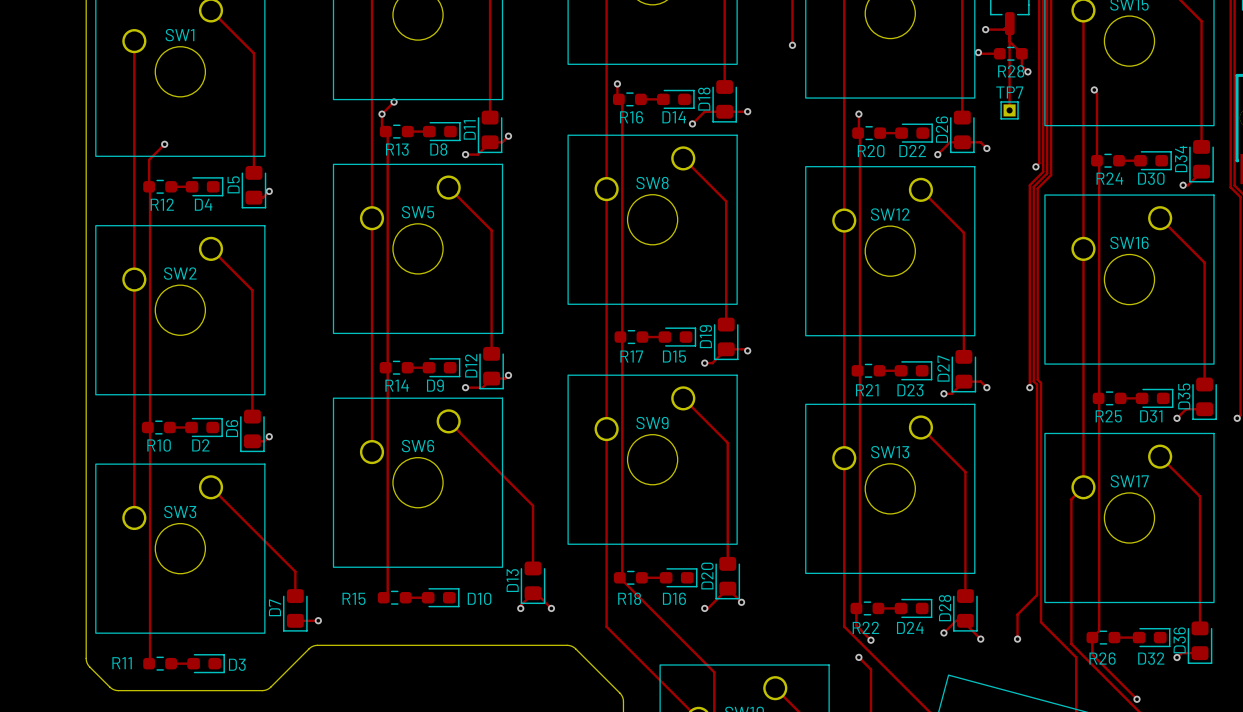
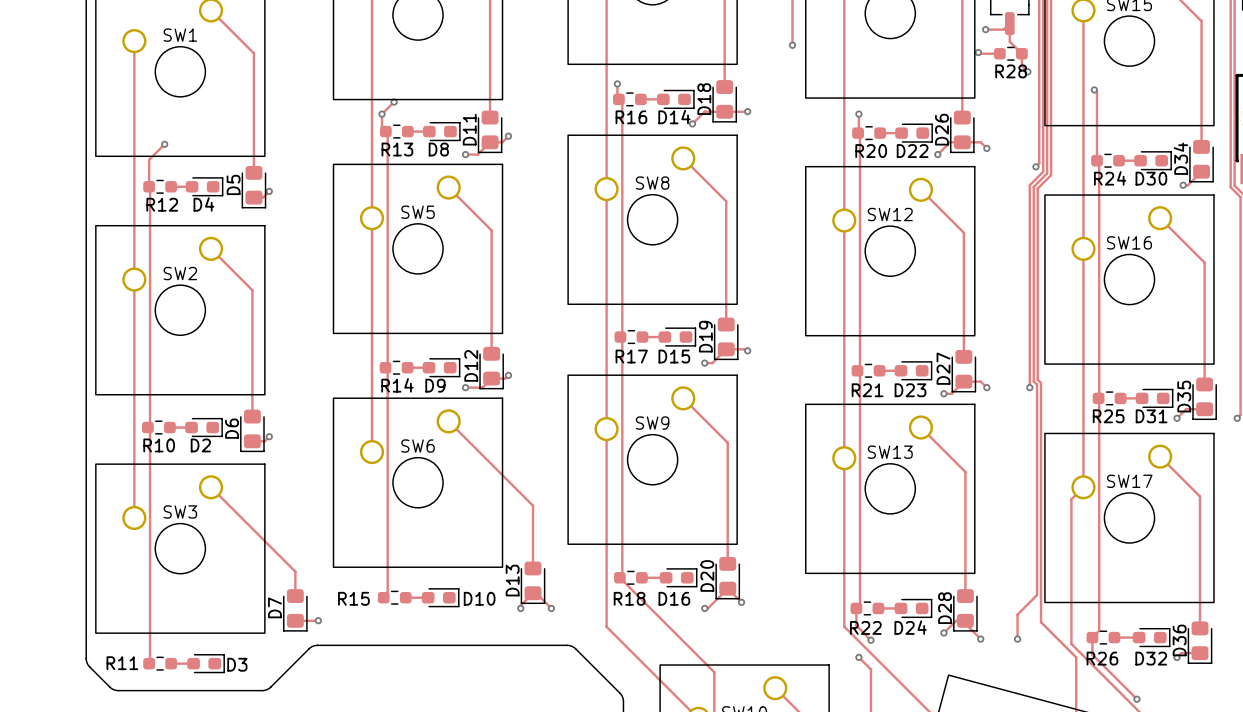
track: (1009, 23) (1009, 110) -> none
TP7: (1009, 110) -> none

